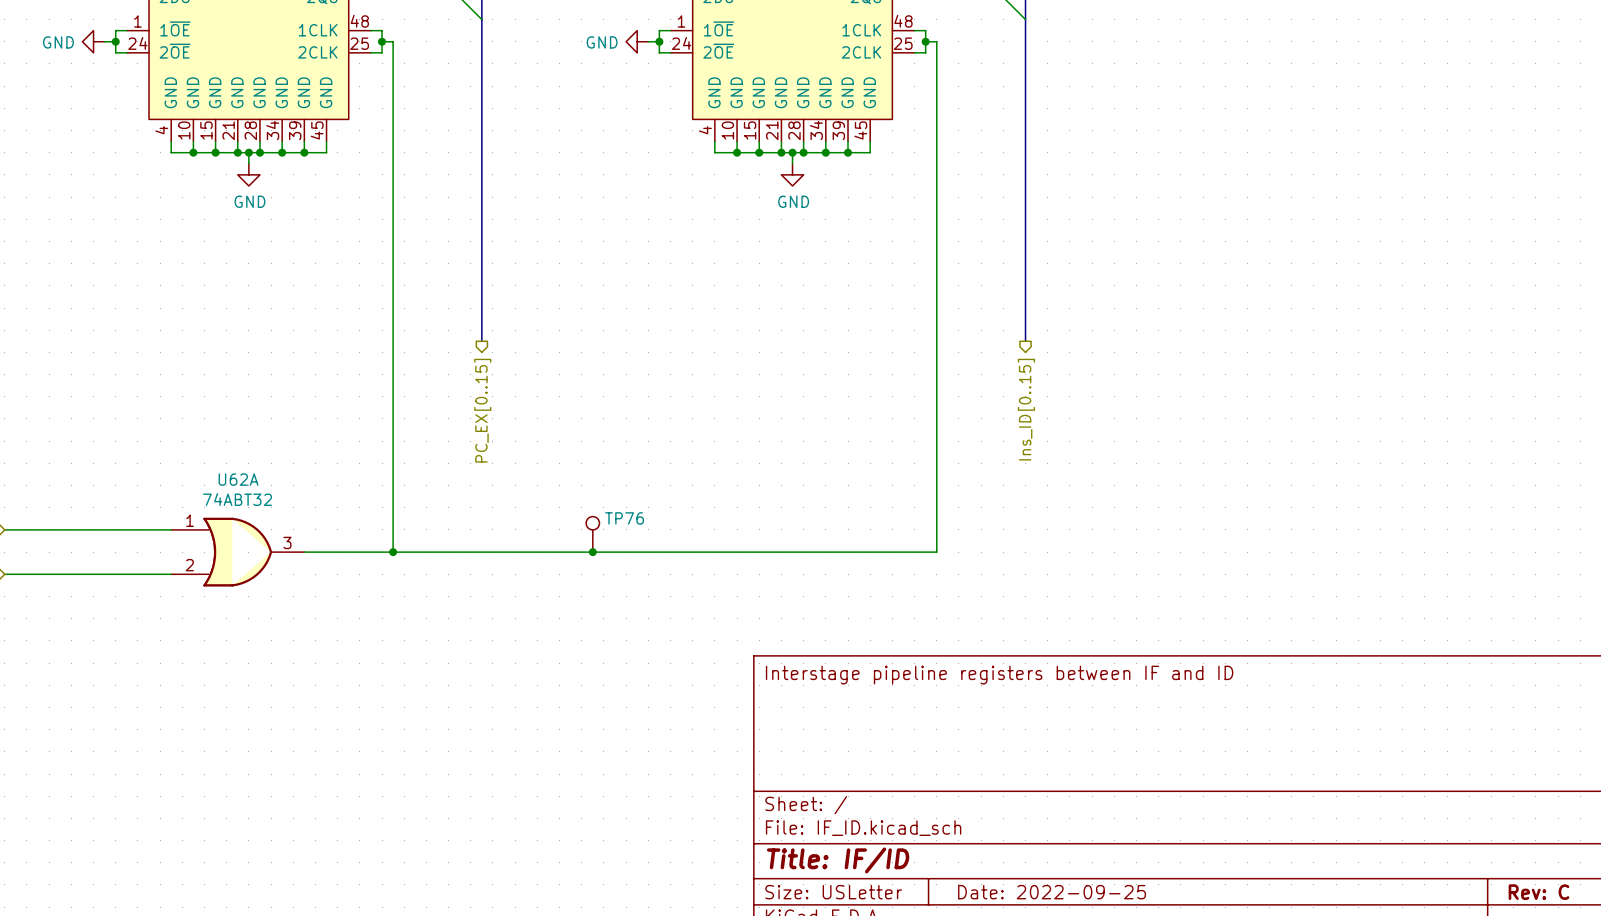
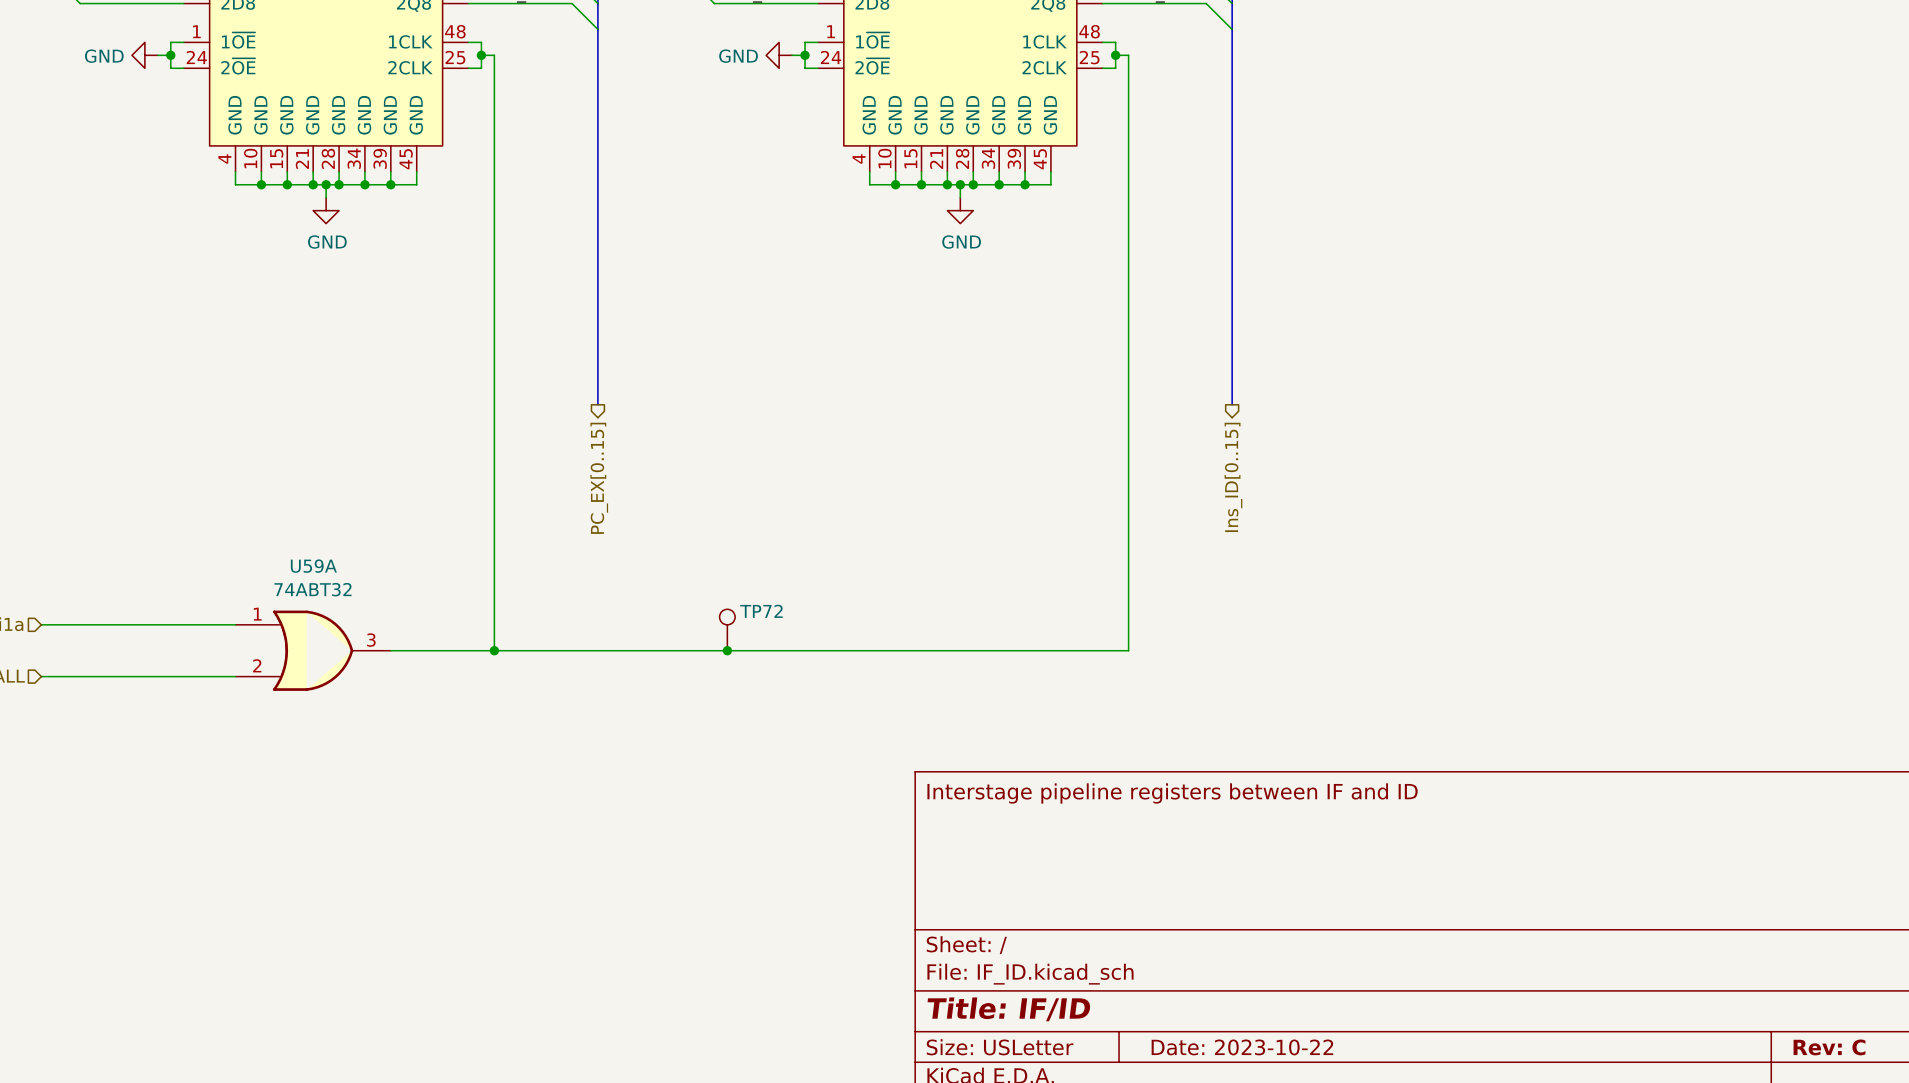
U62A name: U62A (238, 479) -> U59A (313, 566)
TP76 name: TP76 (624, 518) -> TP72 (761, 611)
title block: Date: 2022-09-25 (1052, 892) -> Date: 2023-10-22 (1242, 1047)

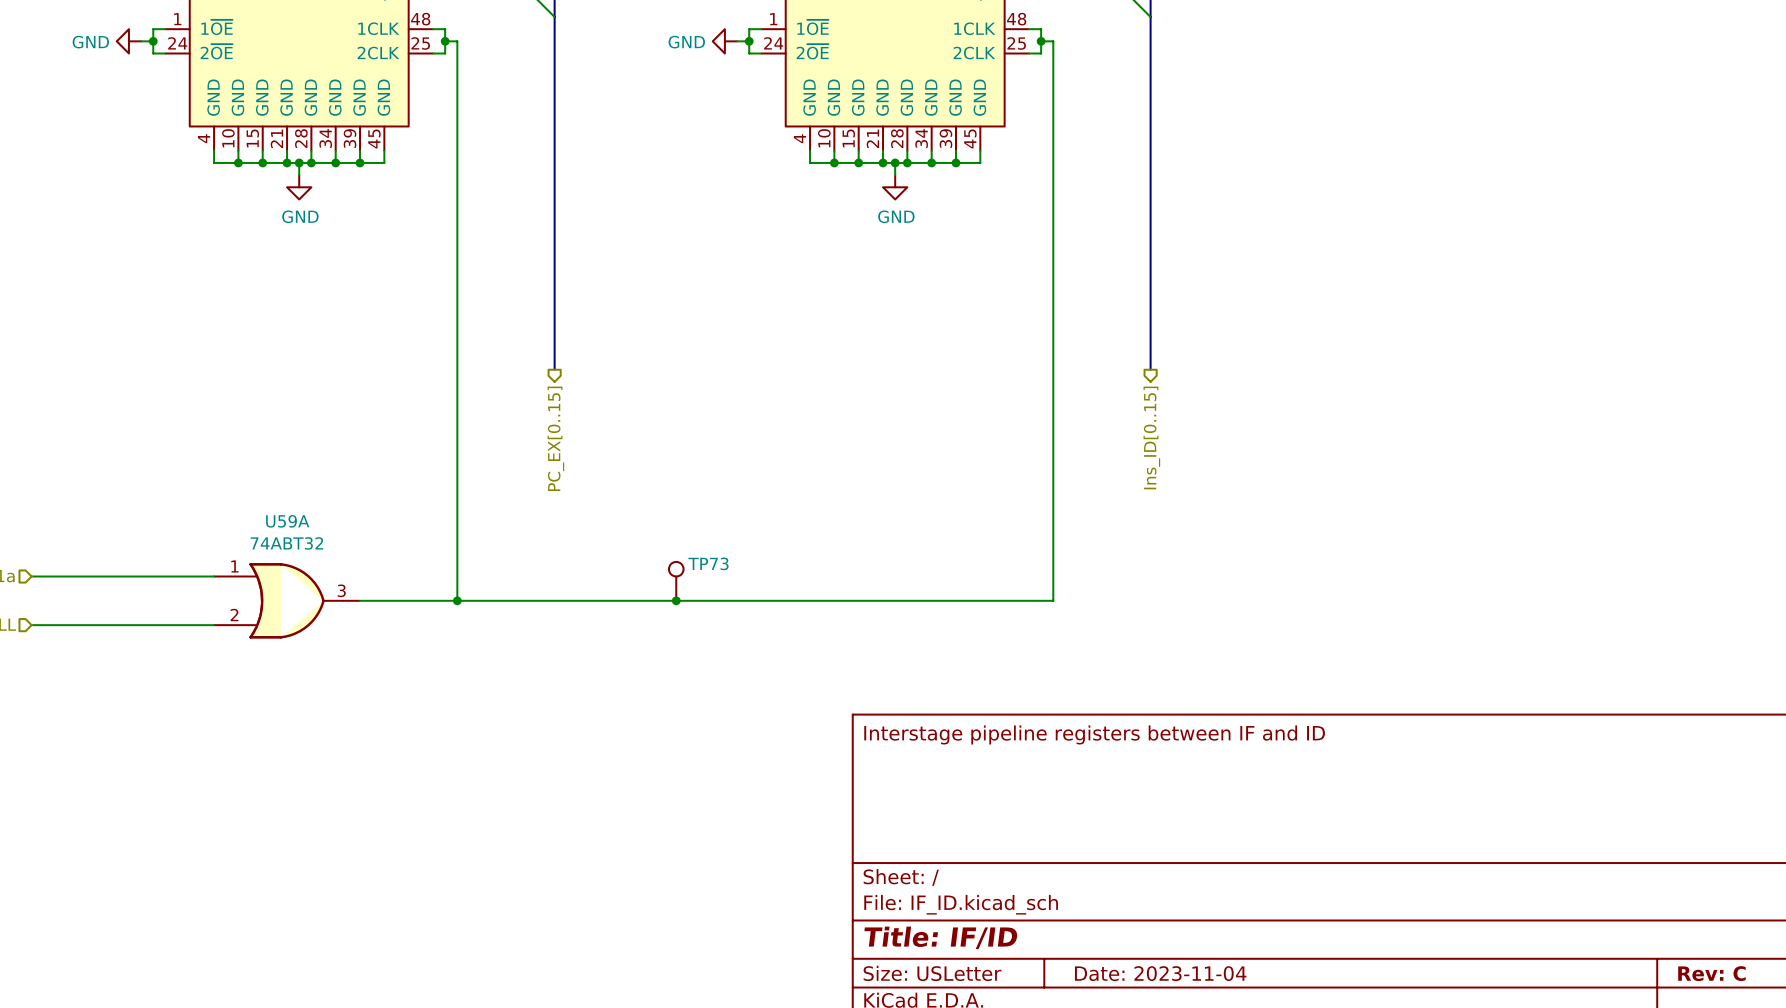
TP72 name: TP72 (761, 611) -> TP73 (708, 563)
title block: Date: 2023-10-22 (1242, 1047) -> Date: 2023-11-04 (1160, 973)

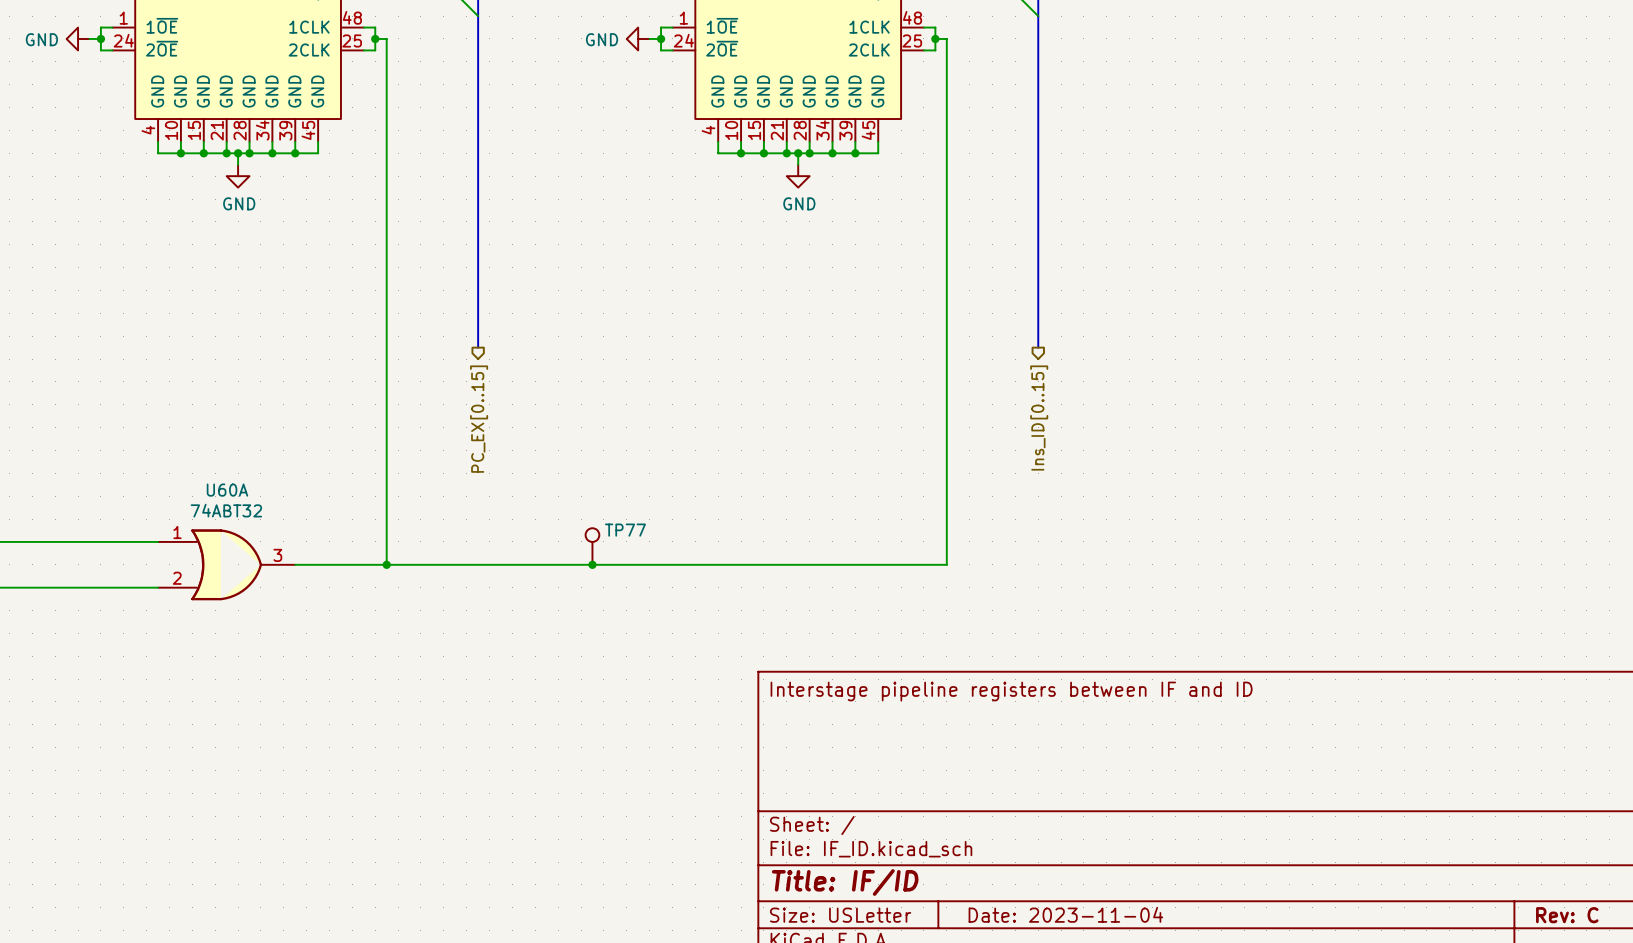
U59A name: U59A (287, 521) -> U60A (227, 490)
TP73 name: TP73 (708, 563) -> TP77 (625, 530)

